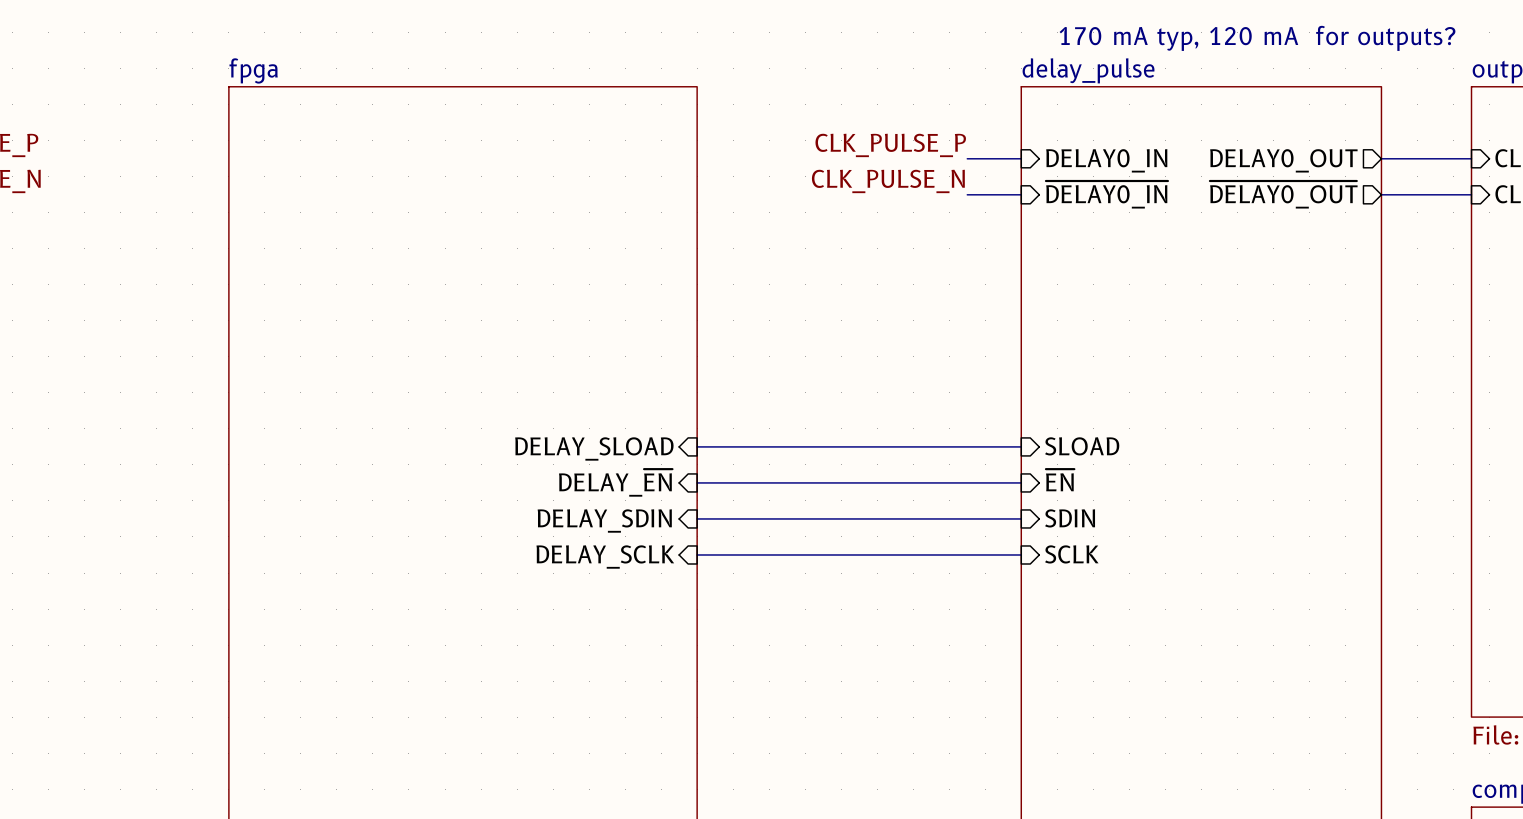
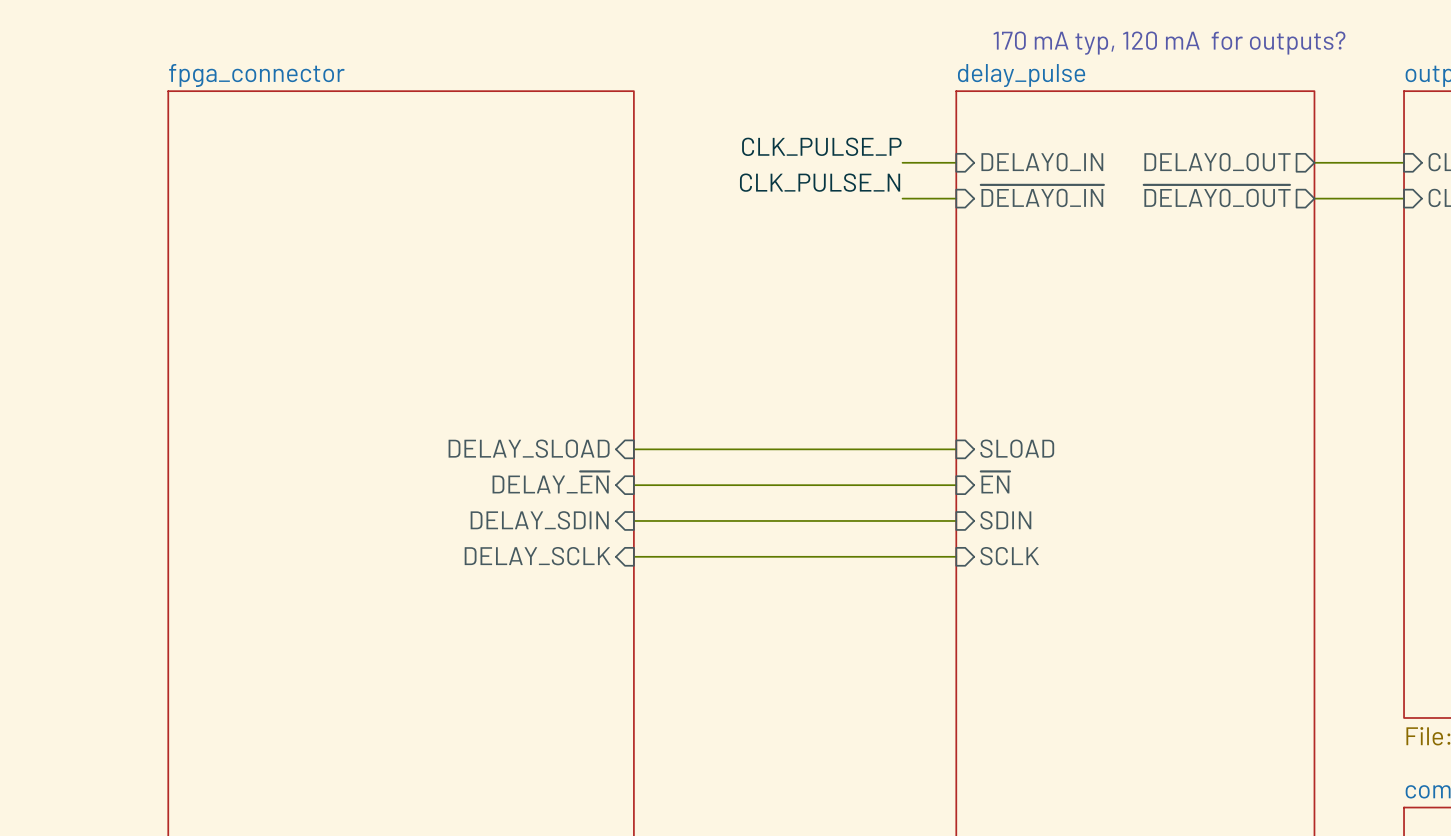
sheet fpga name: fpga (253, 70) -> fpga_connector (256, 75)

